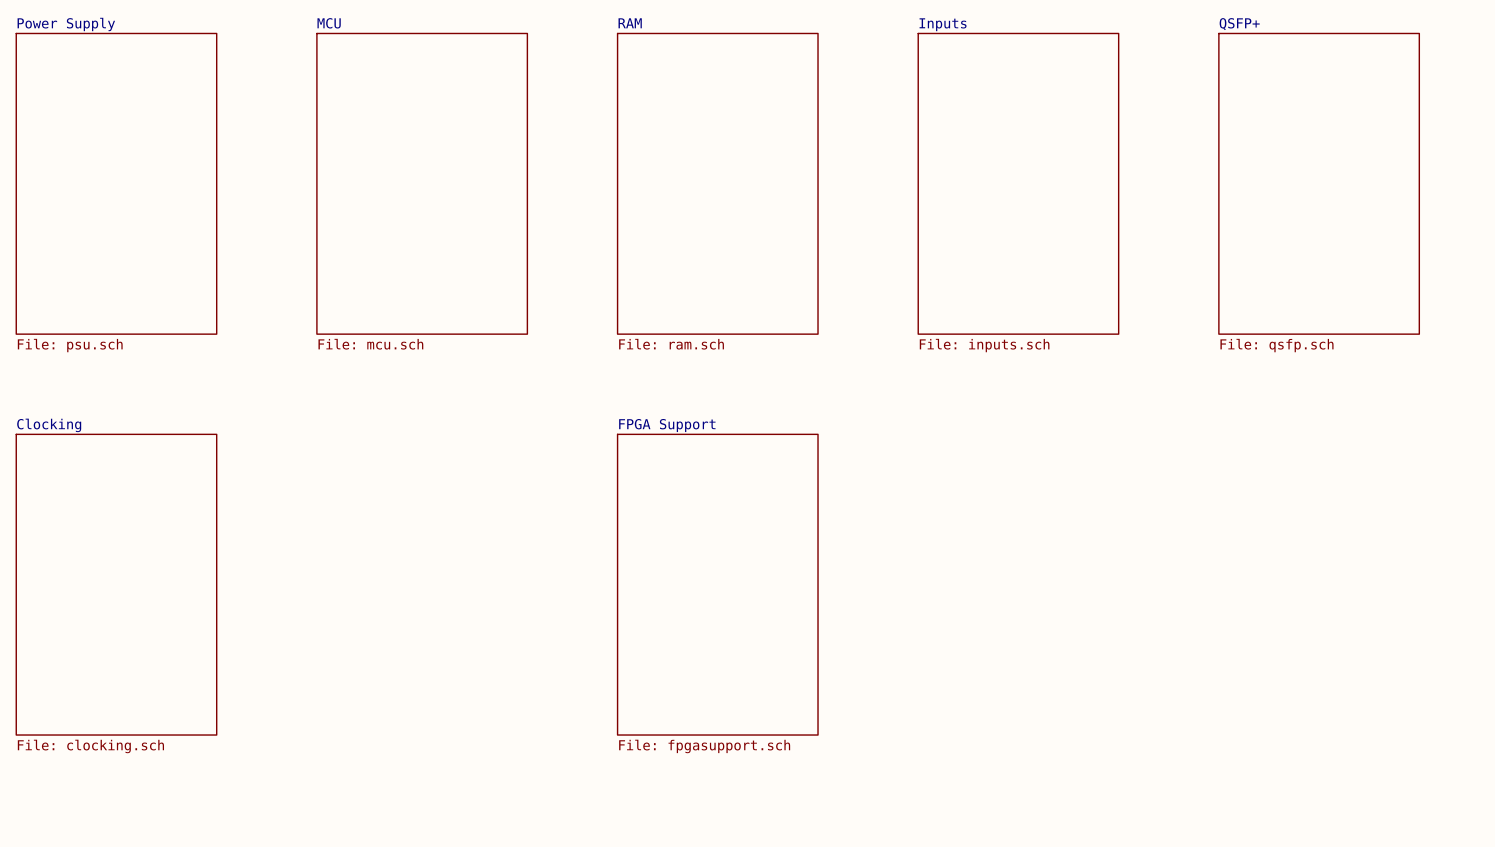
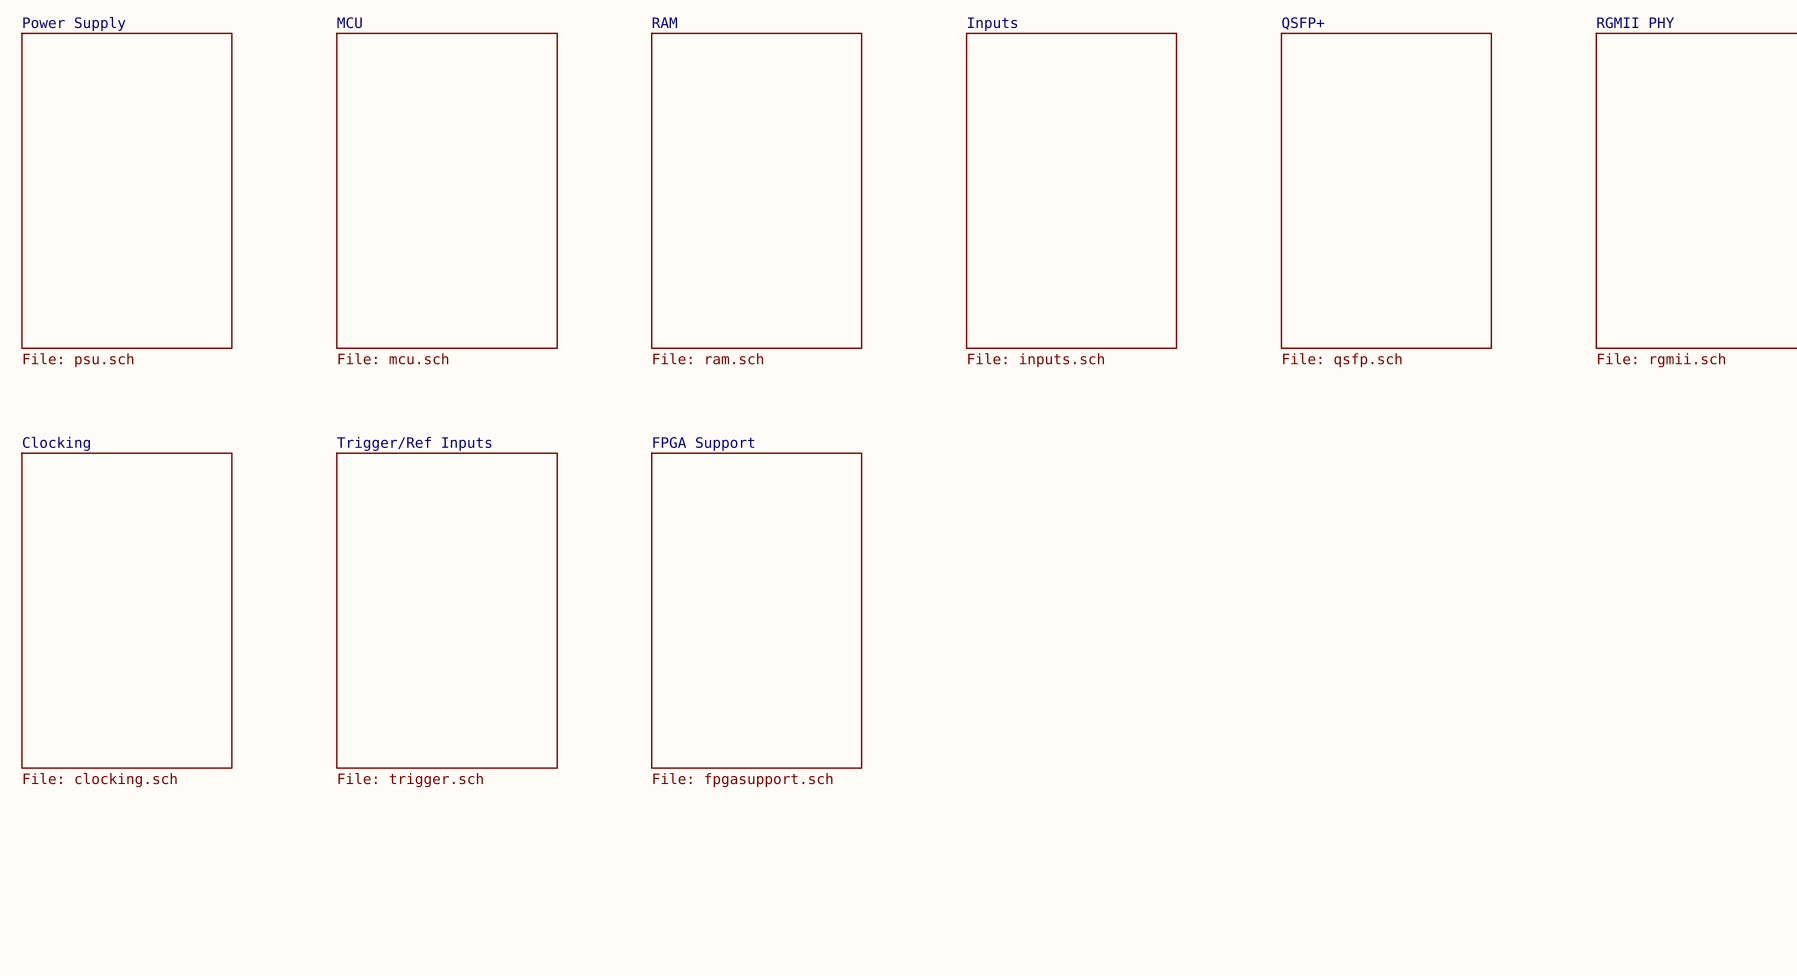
sheet Trigger/Ref Inputs: none -> File: trigger.sch (447, 610)

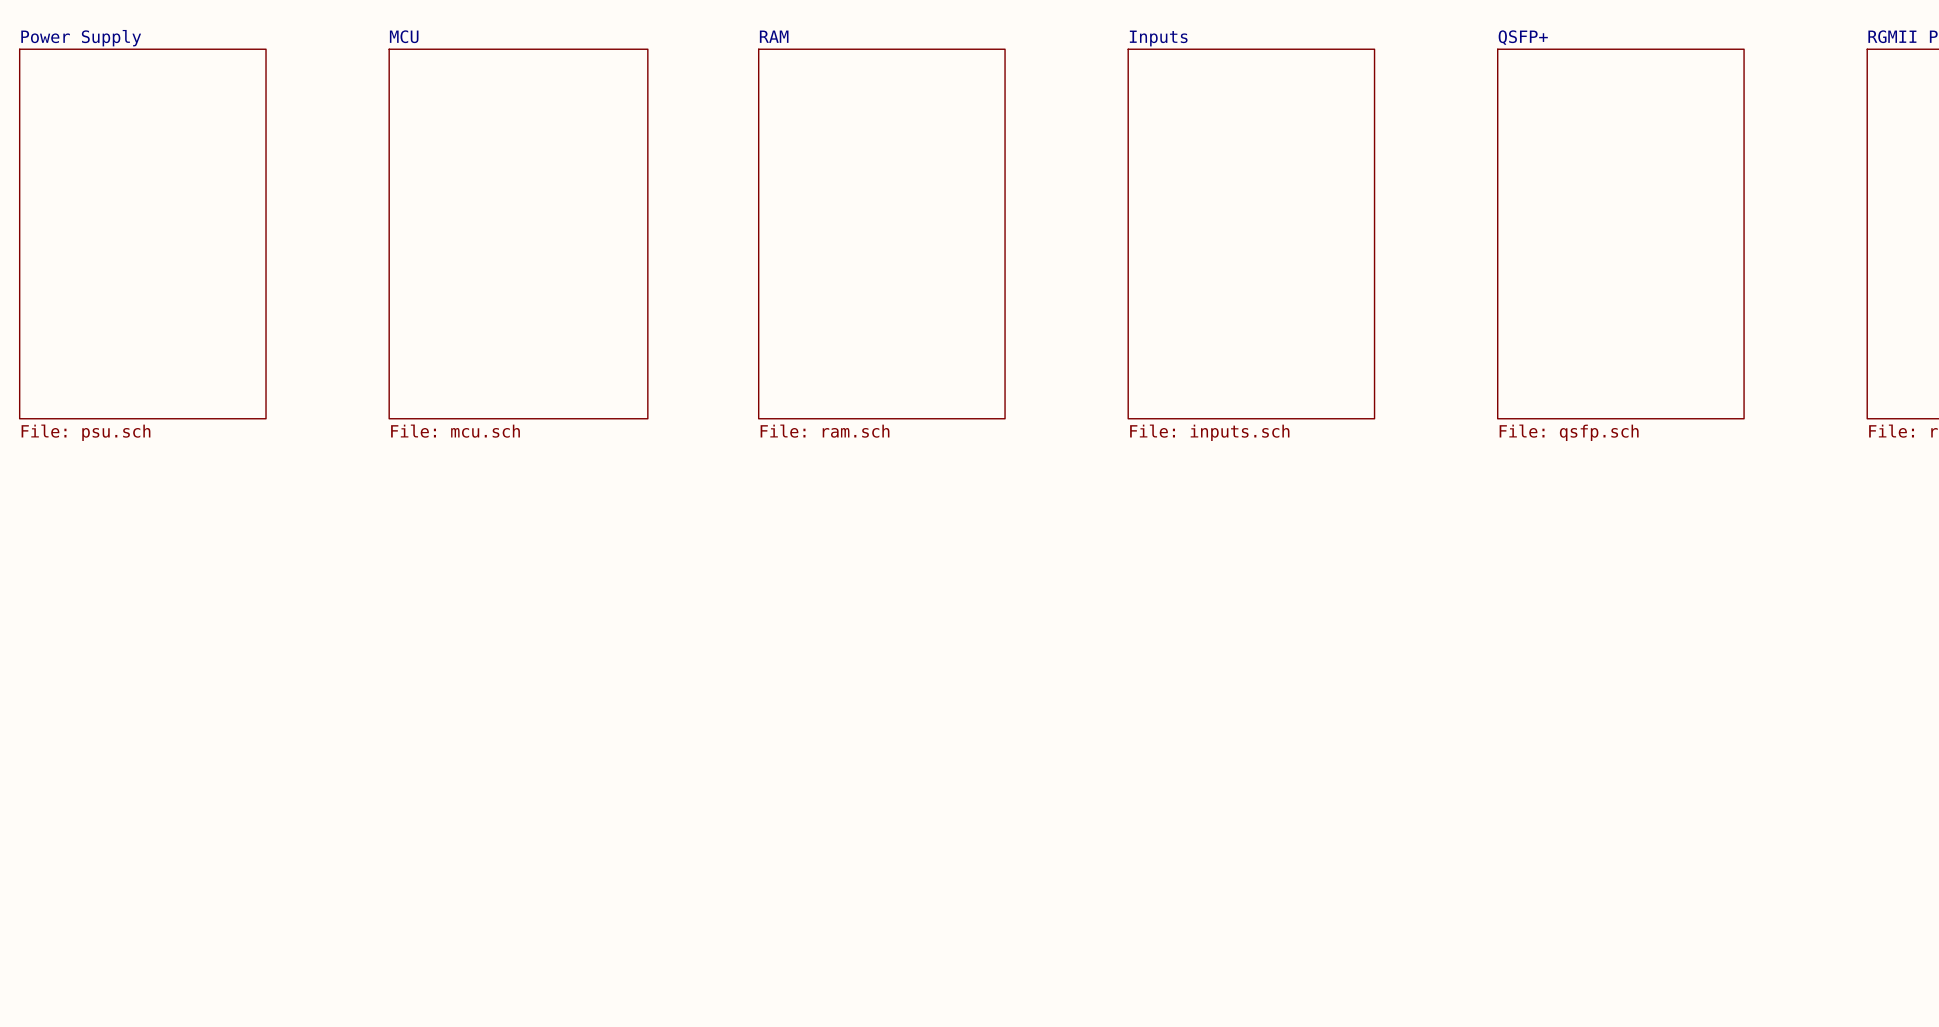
sheet Clocking: File: clocking.sch (126, 610) -> none
sheet Trigger/Ref Inputs: File: trigger.sch (447, 610) -> none
sheet FPGA Support: File: fpgasupport.sch (756, 610) -> none

